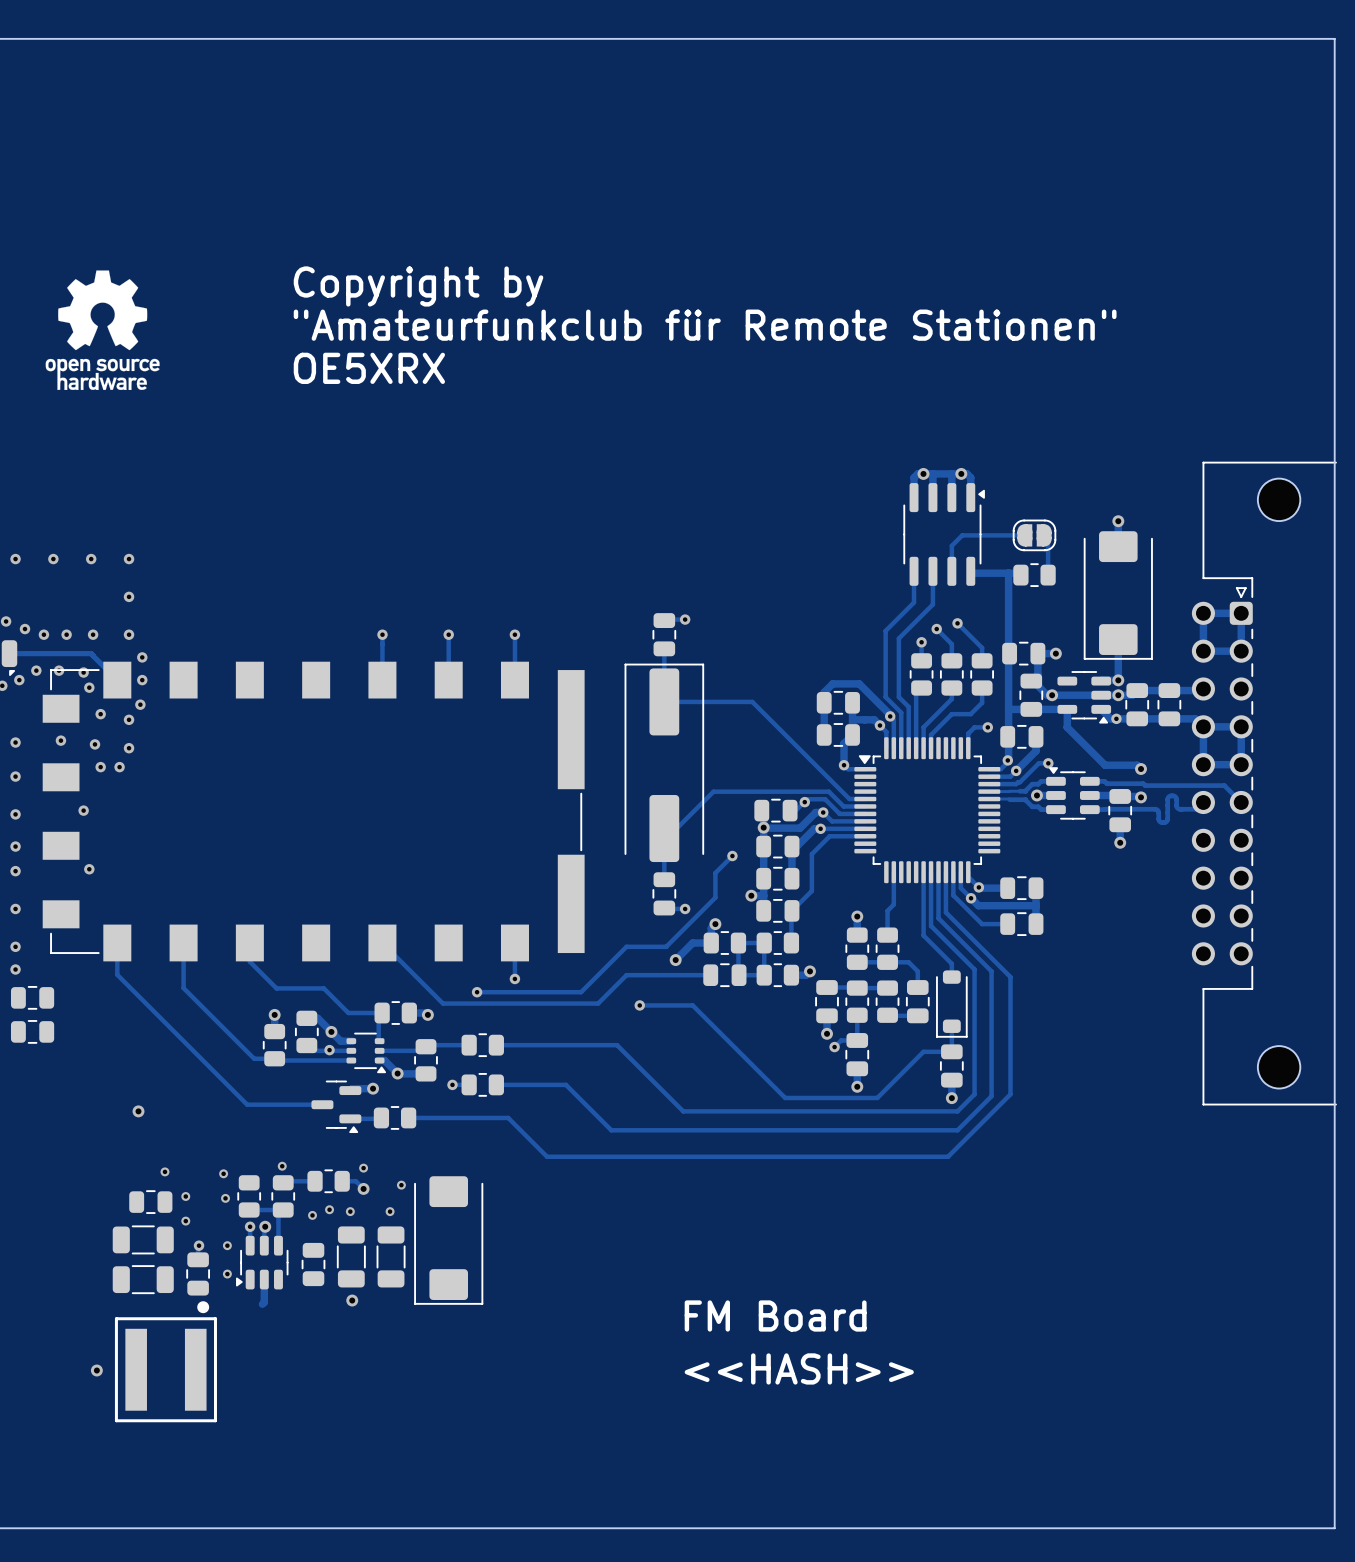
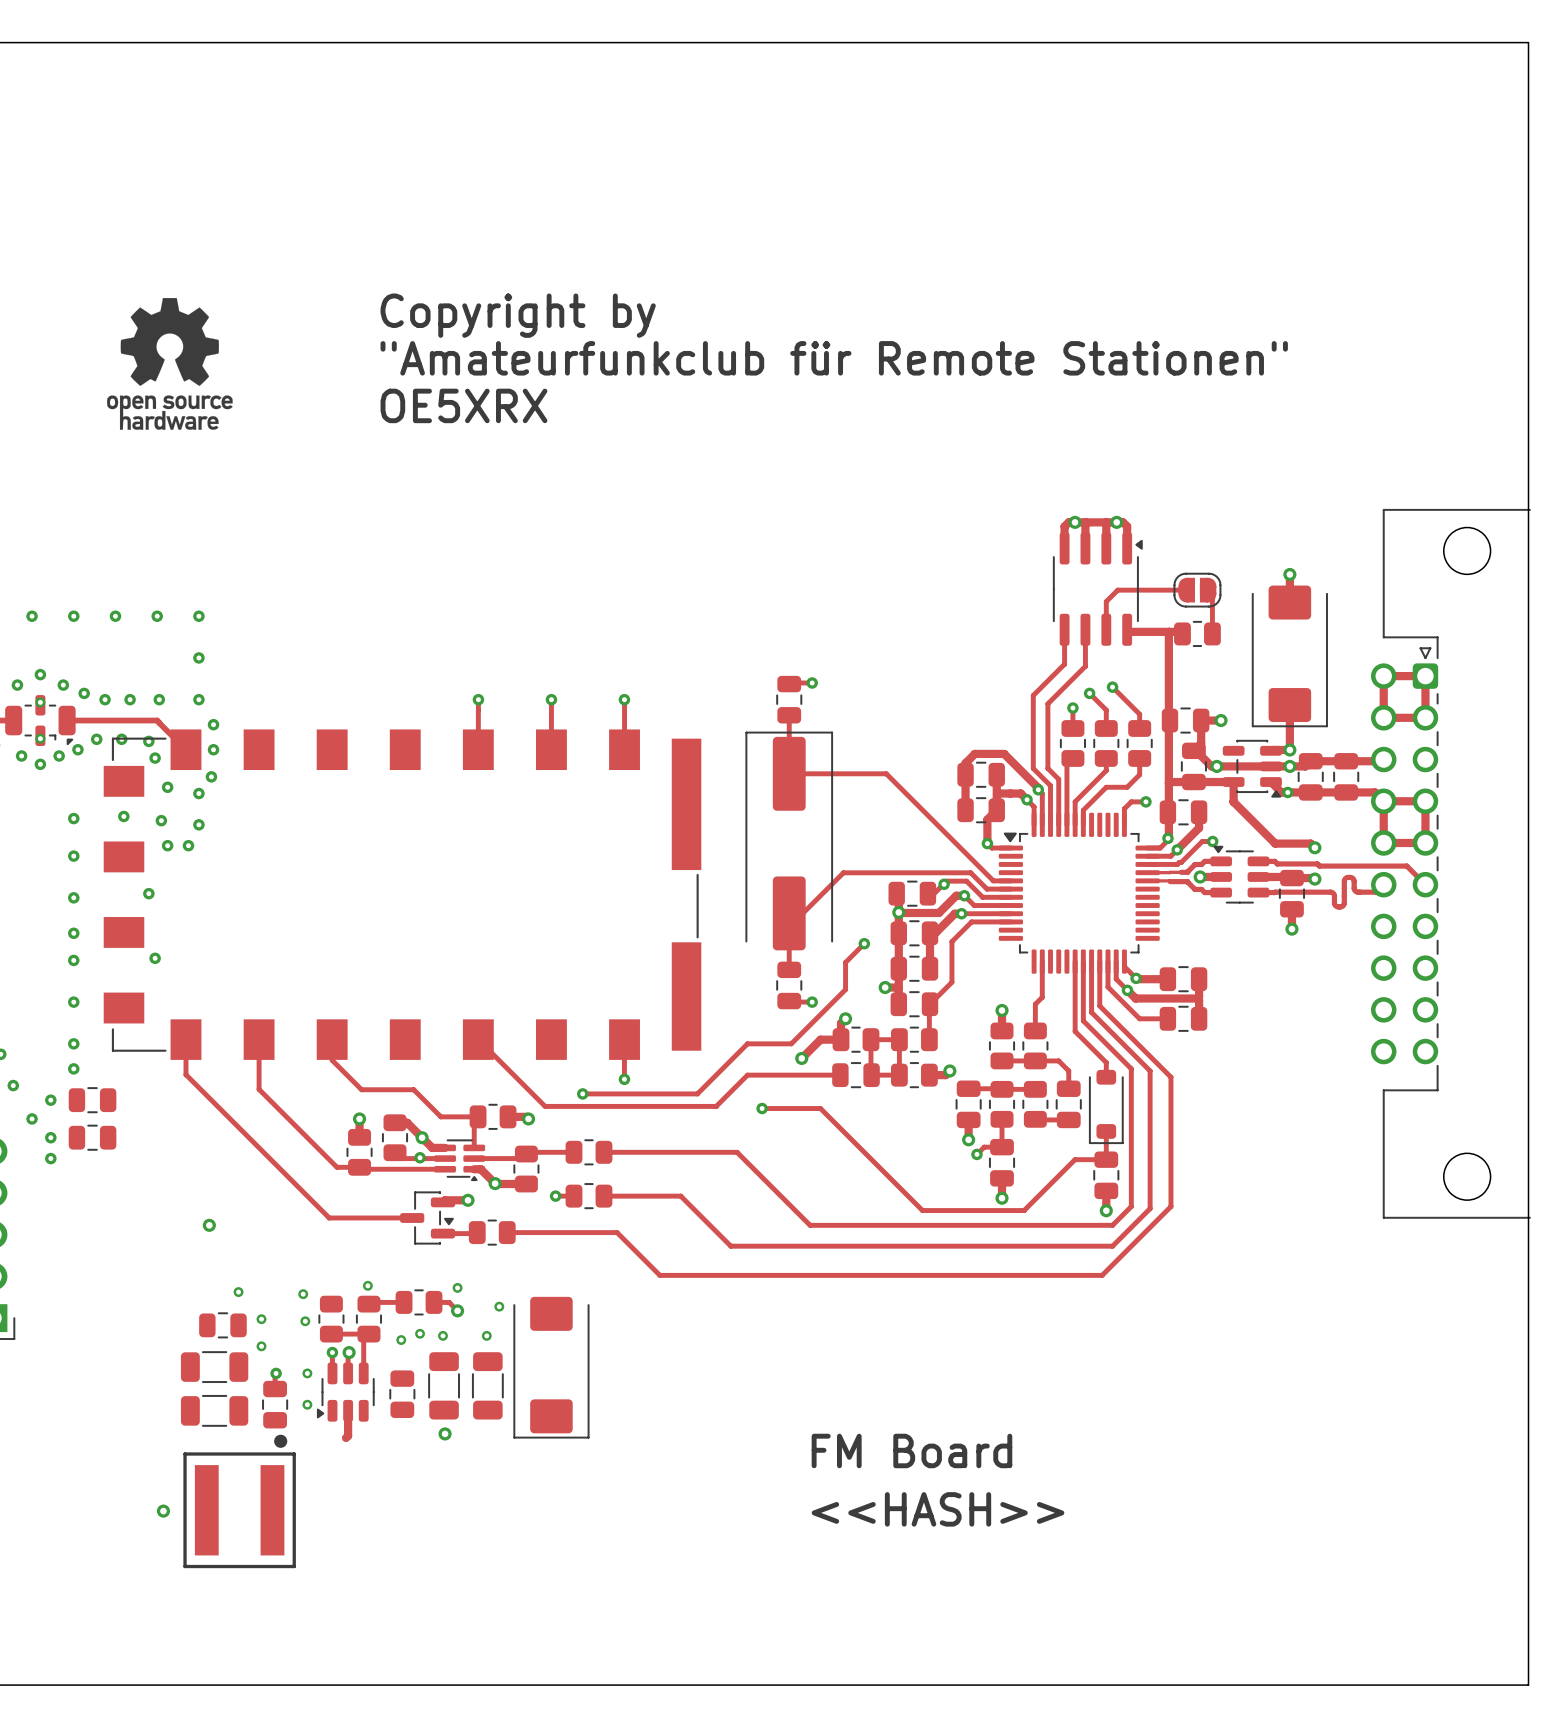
part footprint: [1057, 671, 1112, 724] -> [1222, 739, 1282, 798]
part footprint: [346, 1032, 387, 1074] -> [434, 1139, 486, 1182]
part footprint: [311, 1080, 362, 1134] -> [400, 1191, 456, 1245]

